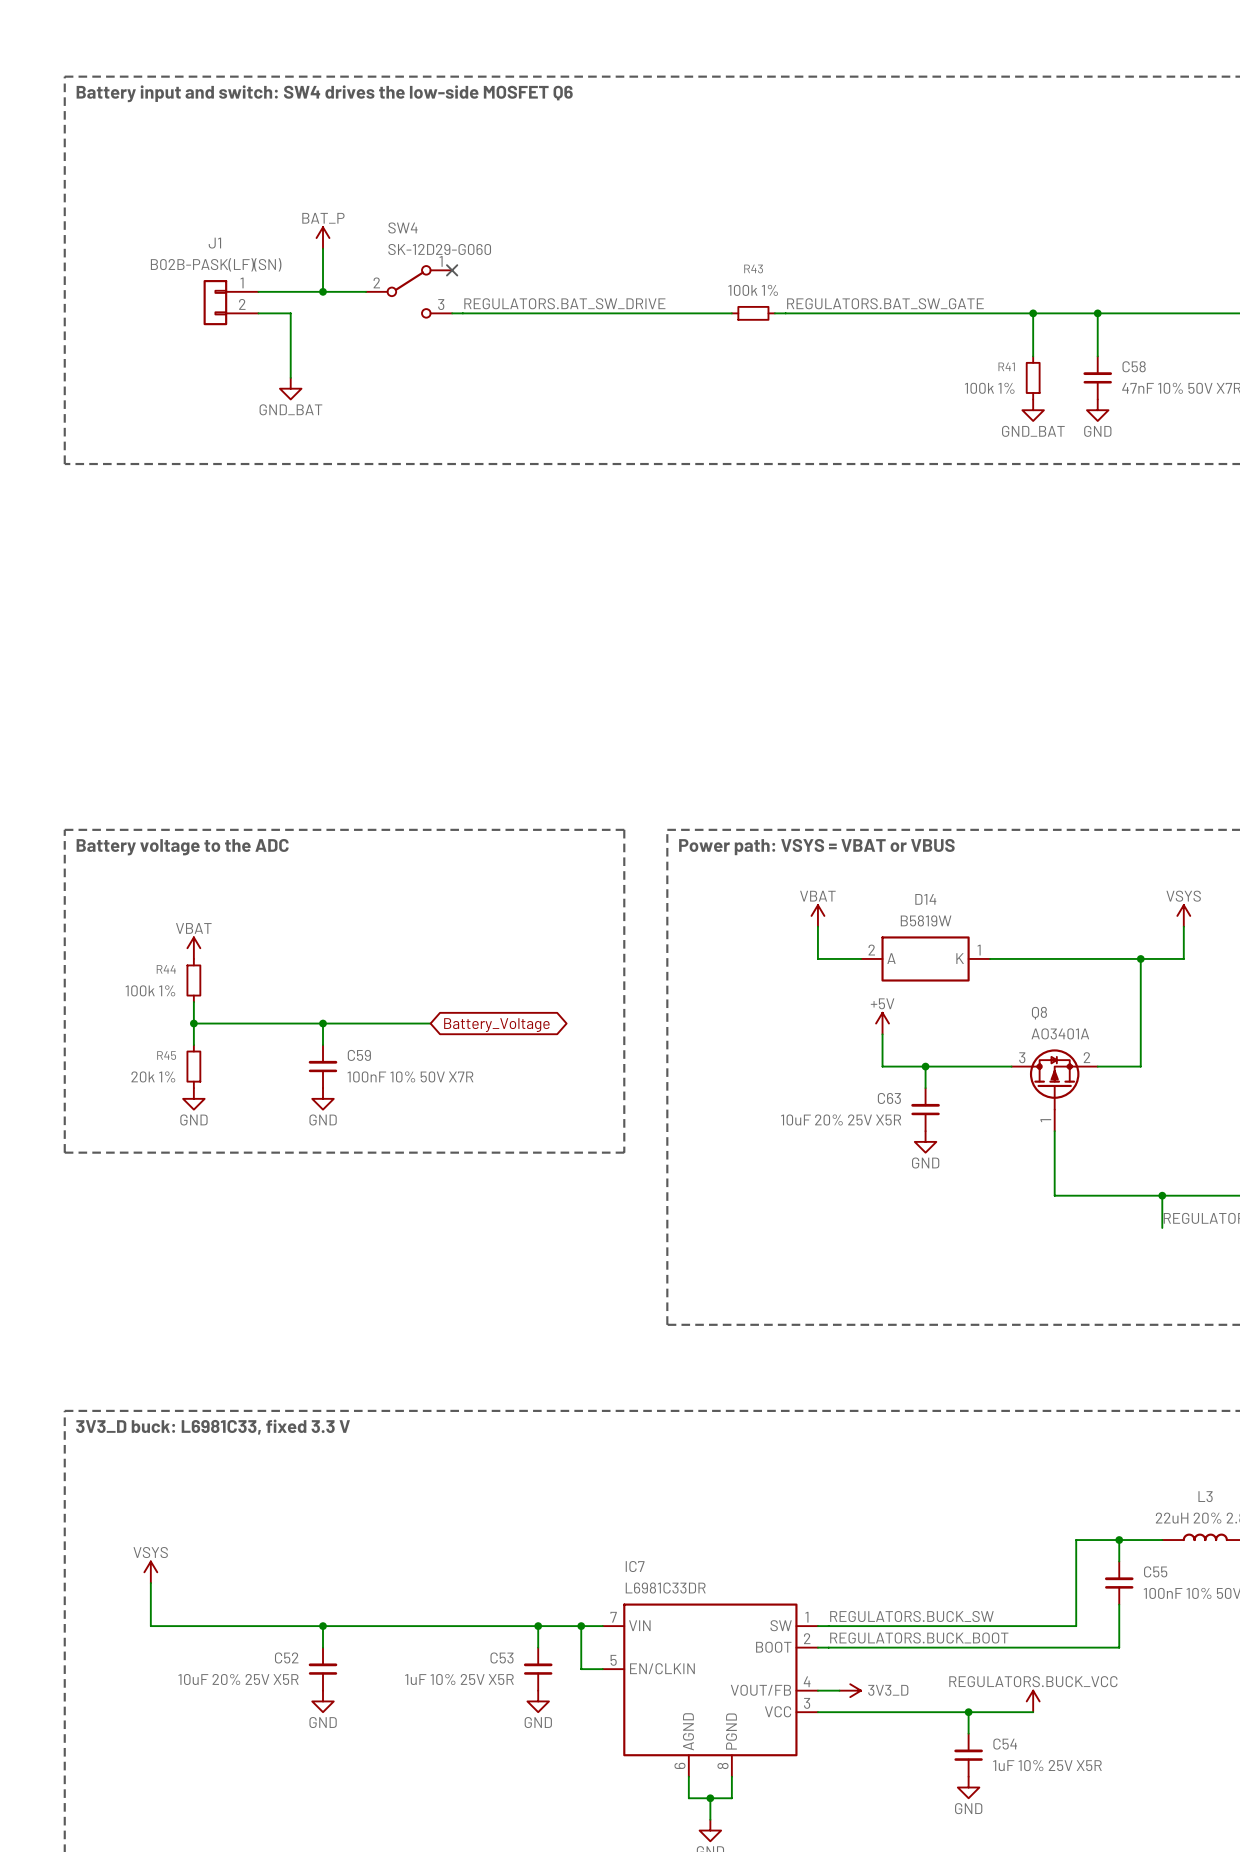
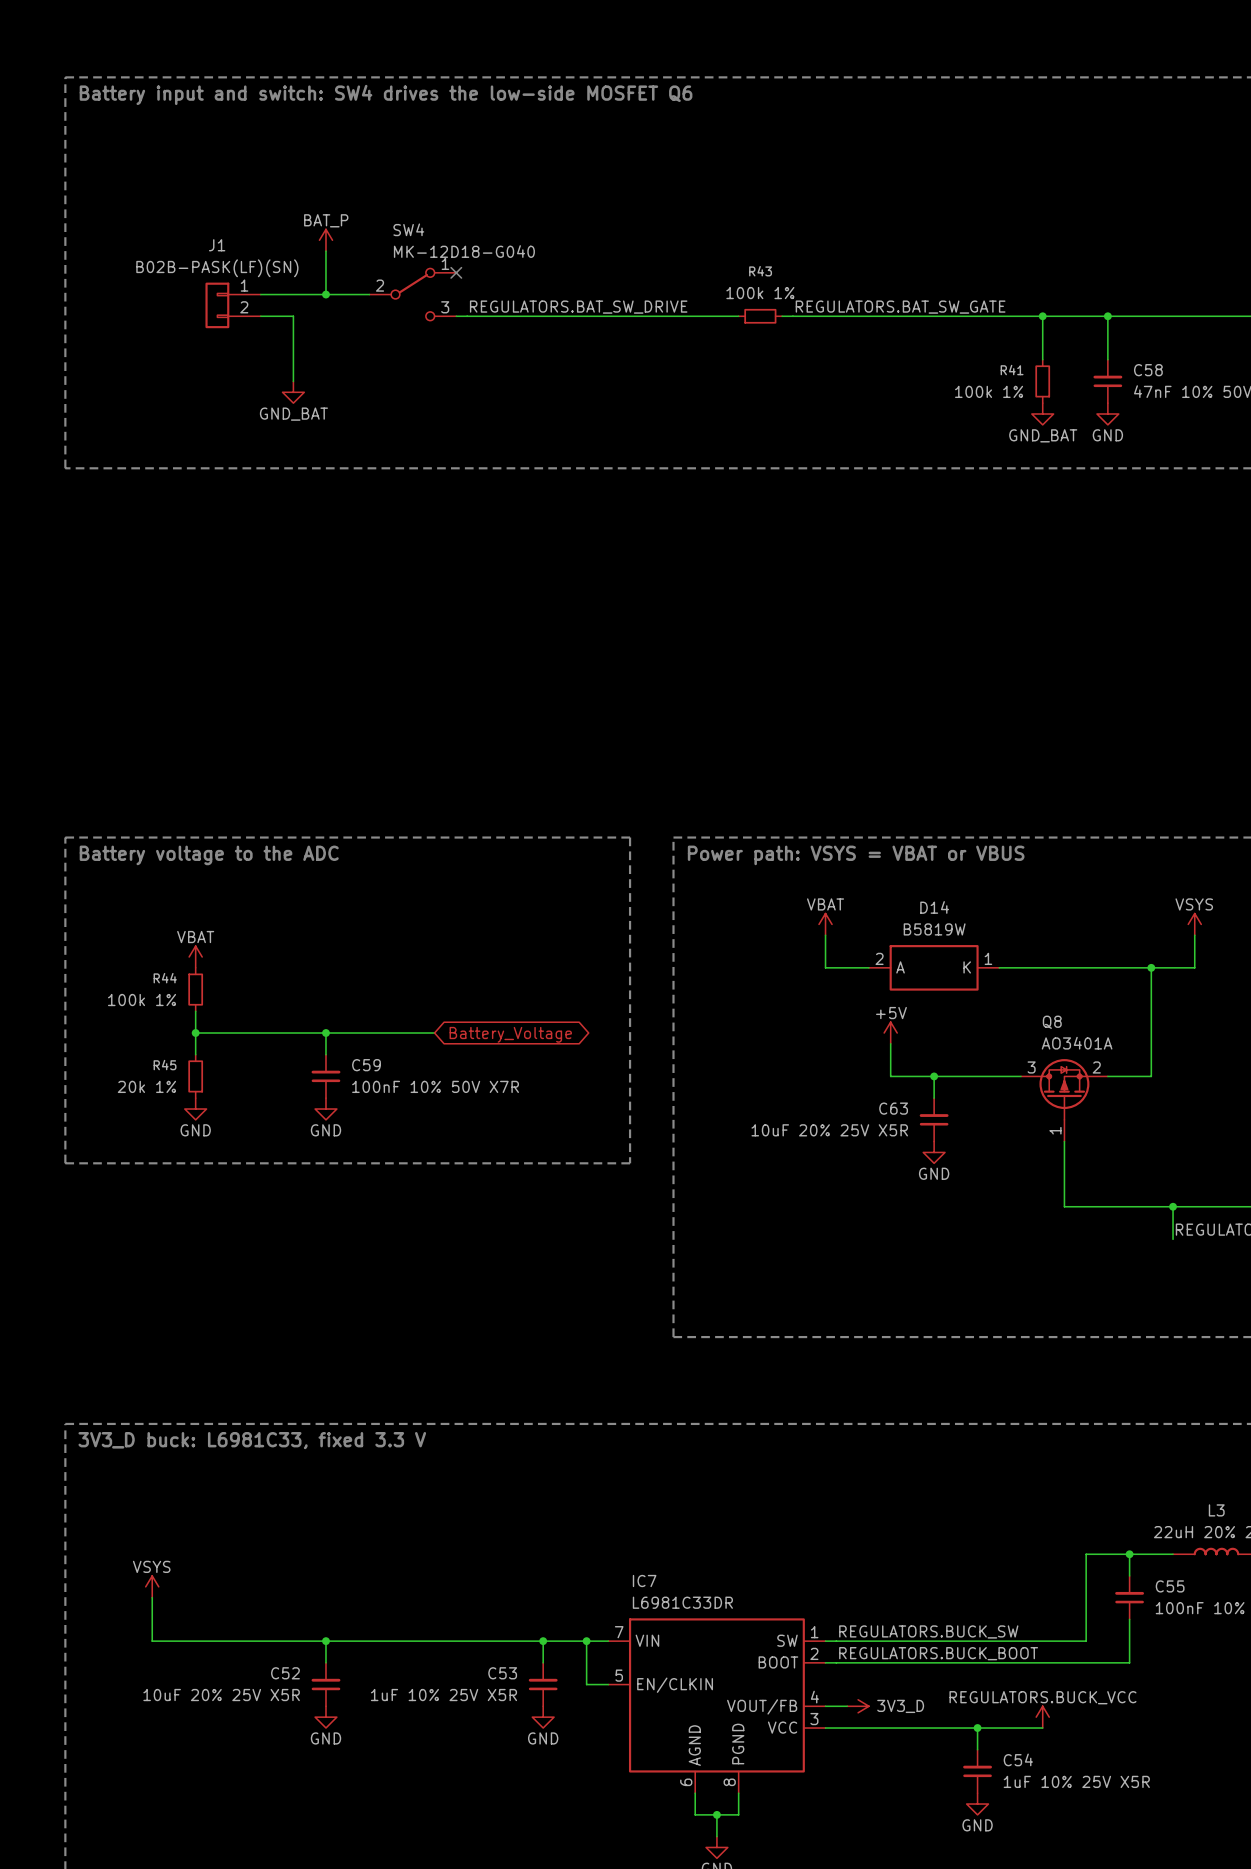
SW4 value: SK-12D29-G060 (439, 249) -> MK-12D18-G040 (464, 251)

